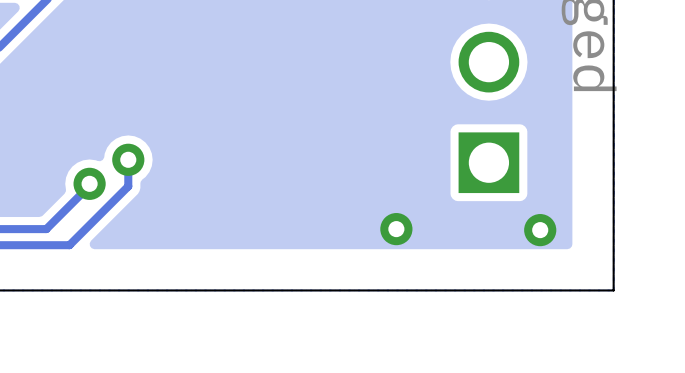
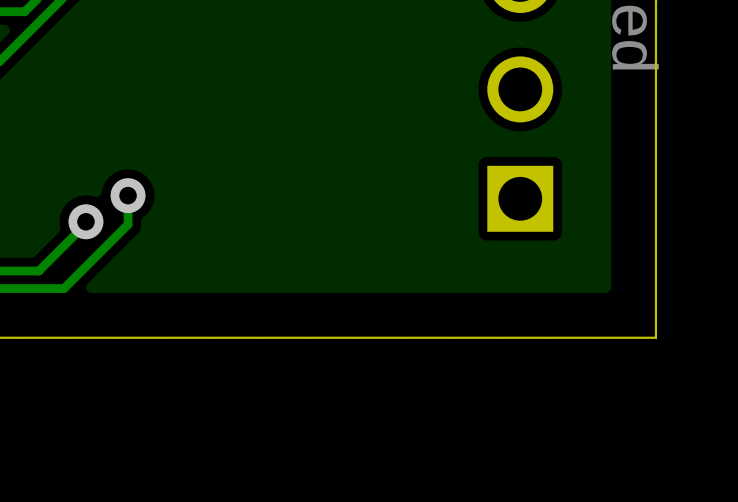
via: (396, 229) -> none
via: (540, 230) -> none

